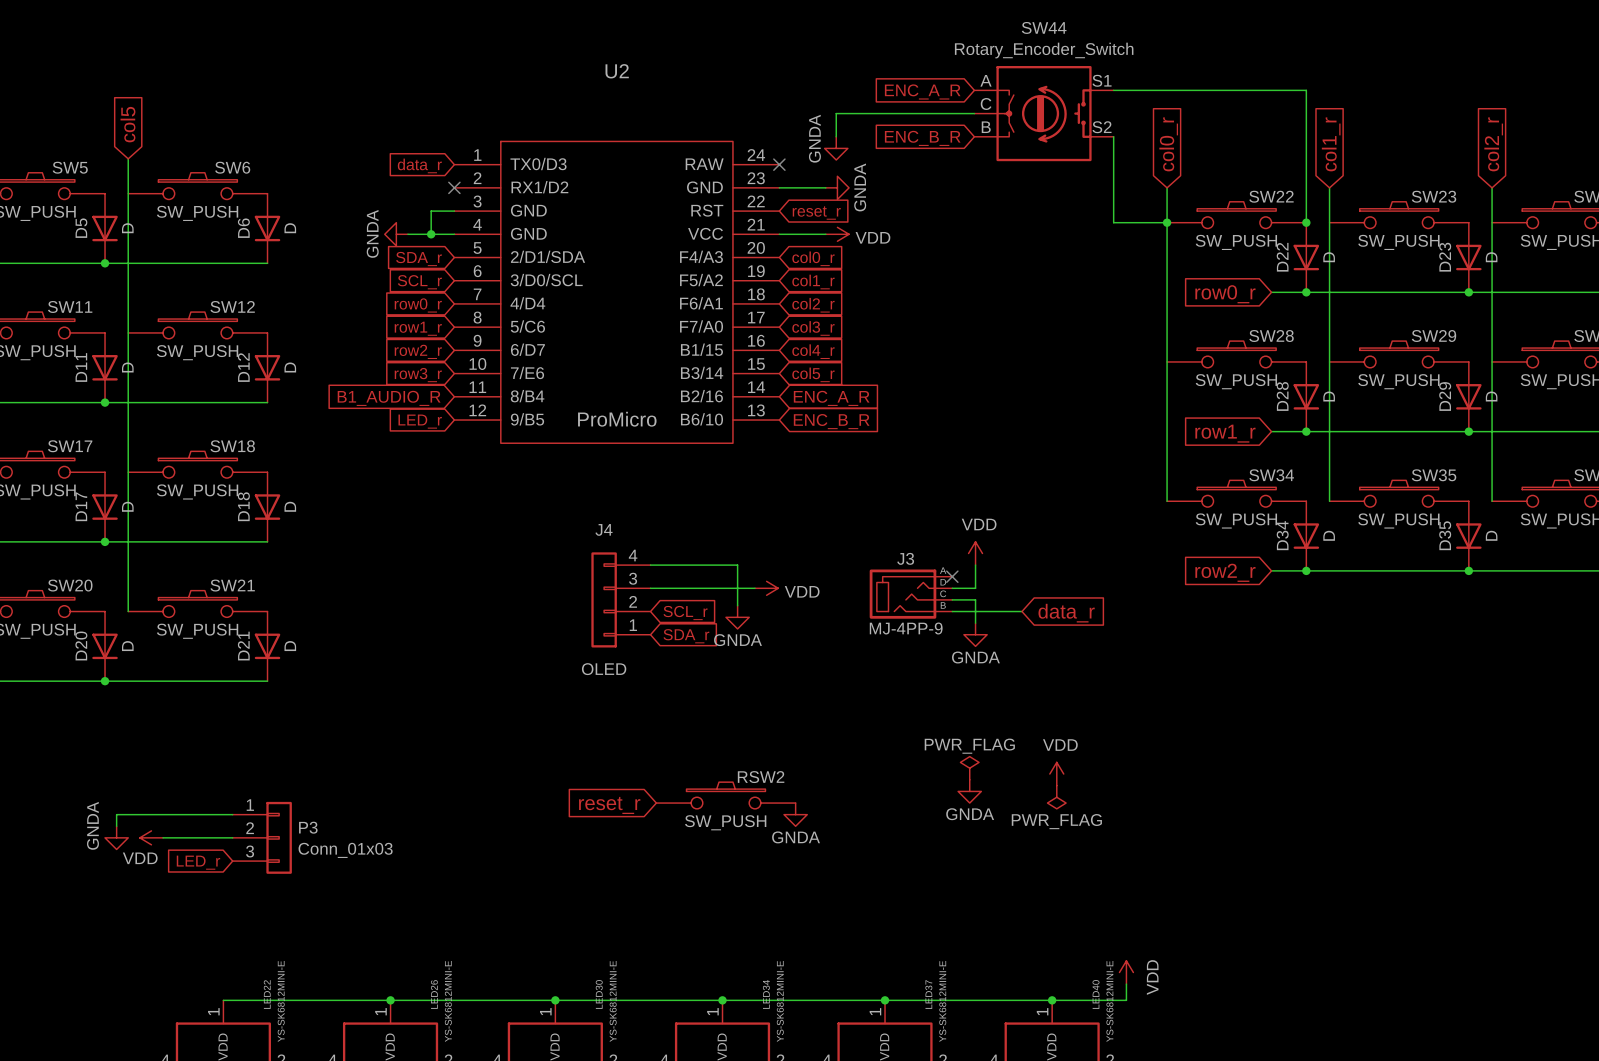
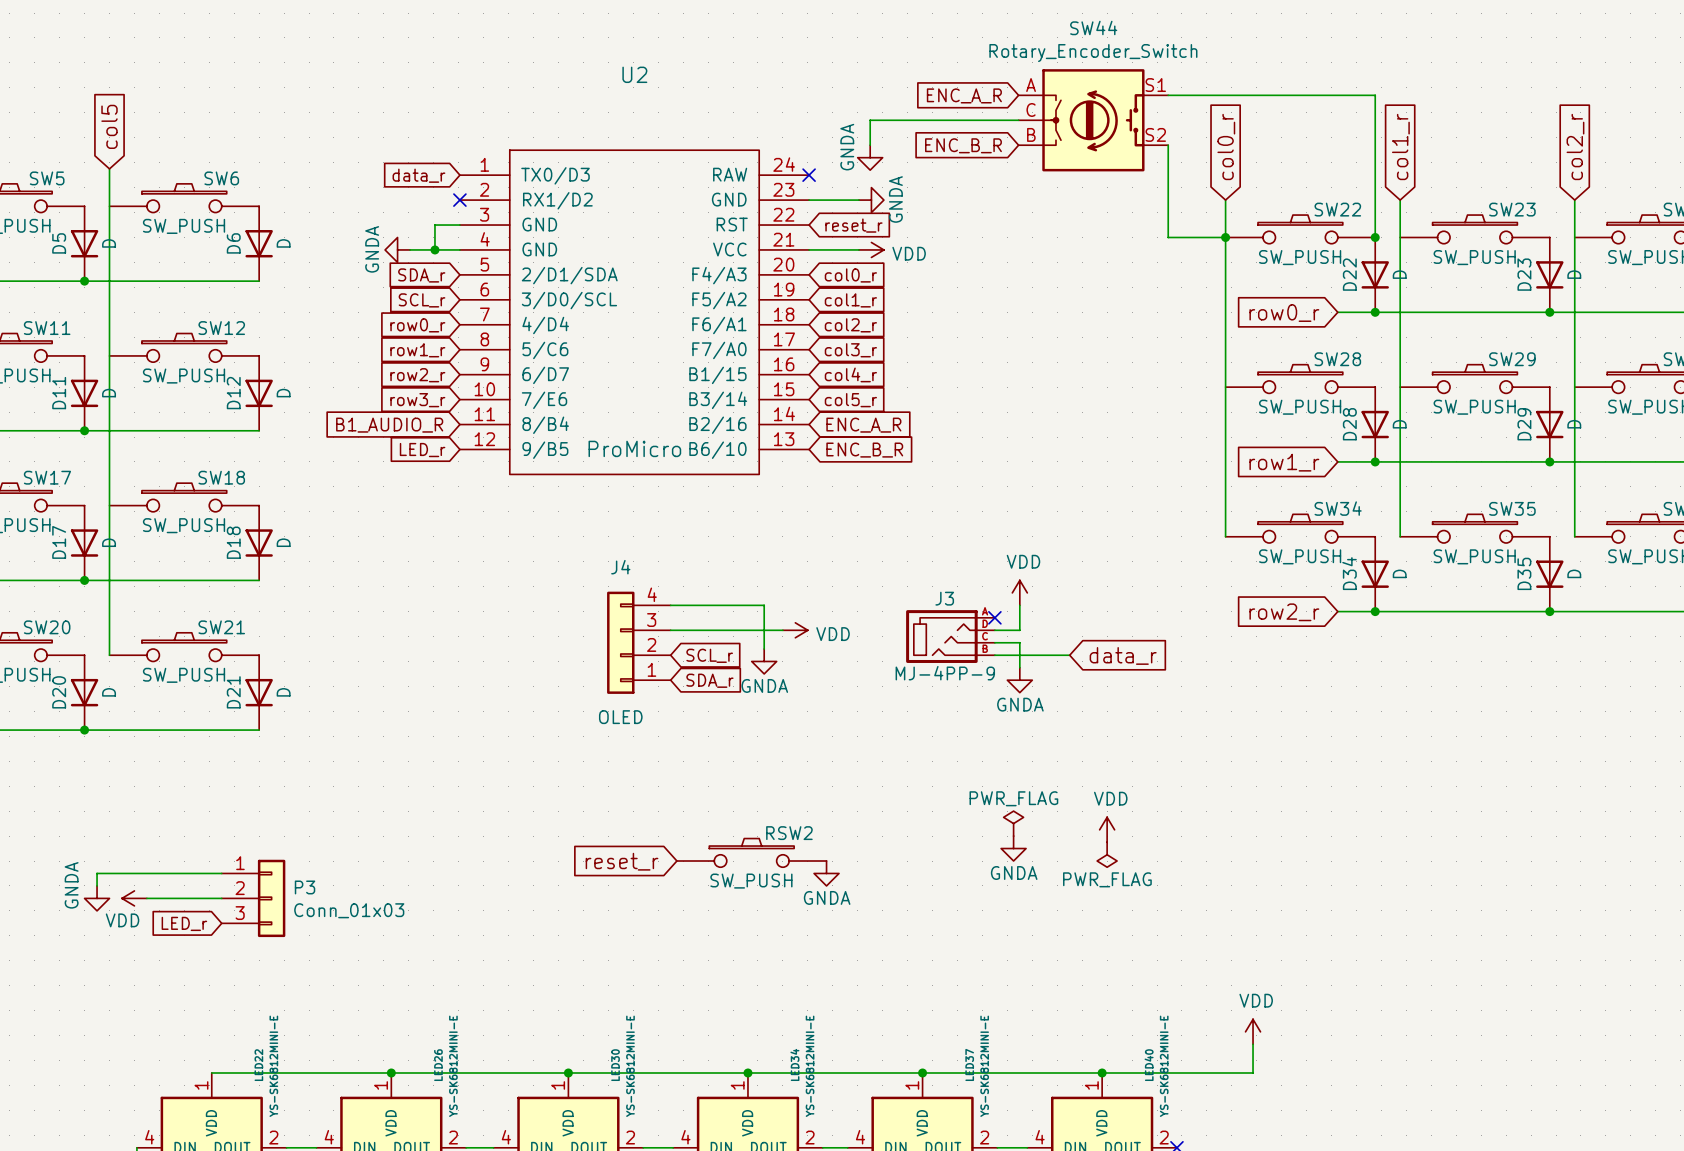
power symbol position: VDD (1126, 972) -> VDD (1253, 1031)
power symbol text rotation: 0° (1152, 977) -> 90° clockwise (1256, 1000)
wire: (1126, 984) (1126, 1000) -> (1253, 1044) (1253, 1072) (1181, 1072)

